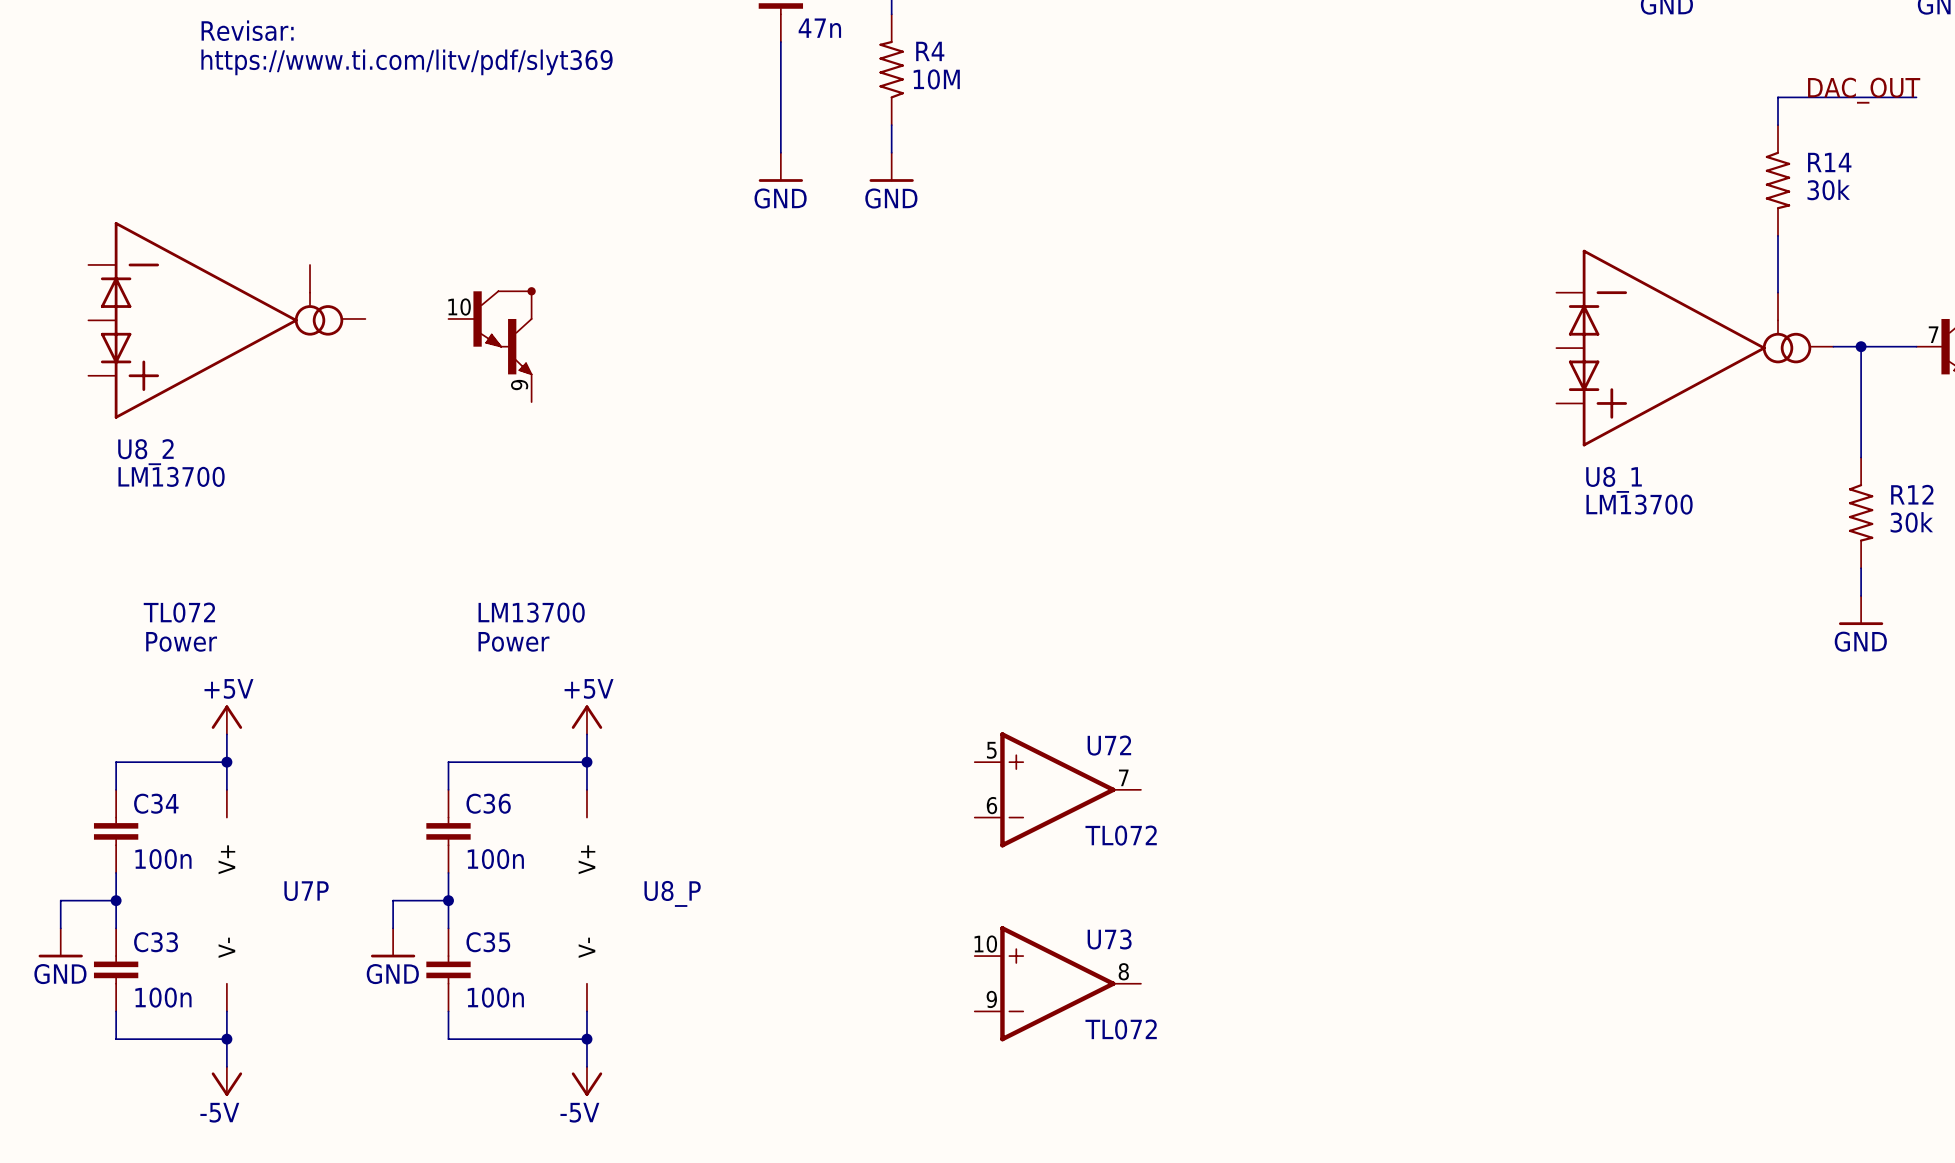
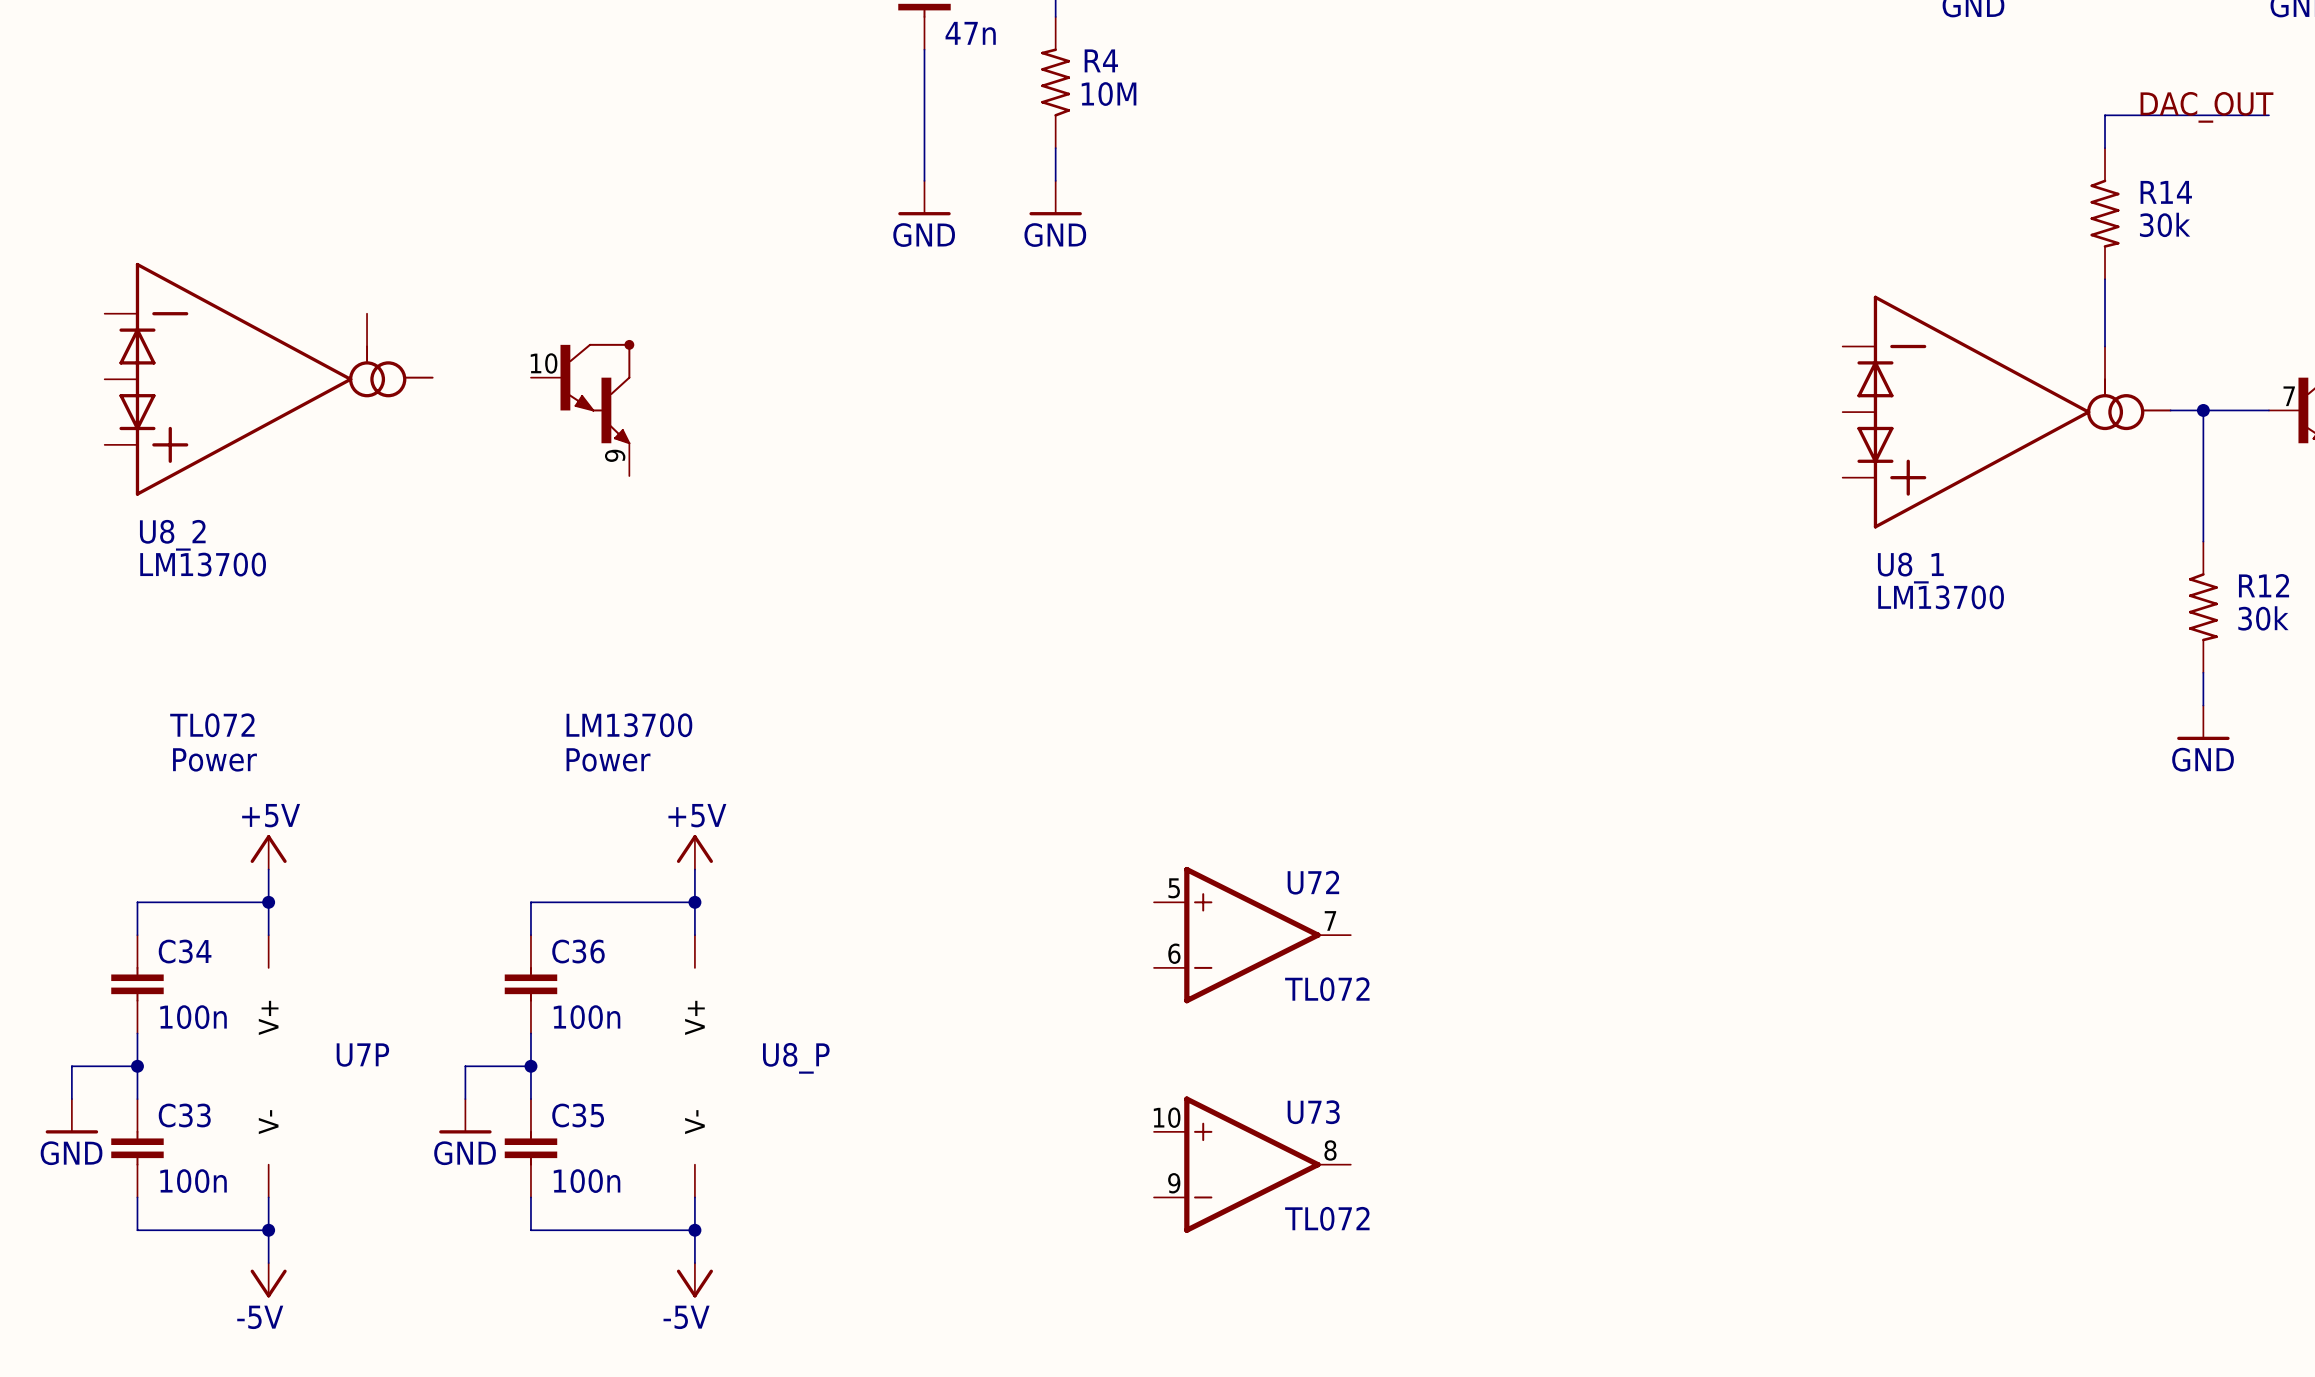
text: Revisar: (247, 30) -> none
text: https://www.ti.com/litv/pdf/slyt369 (407, 62) -> none

